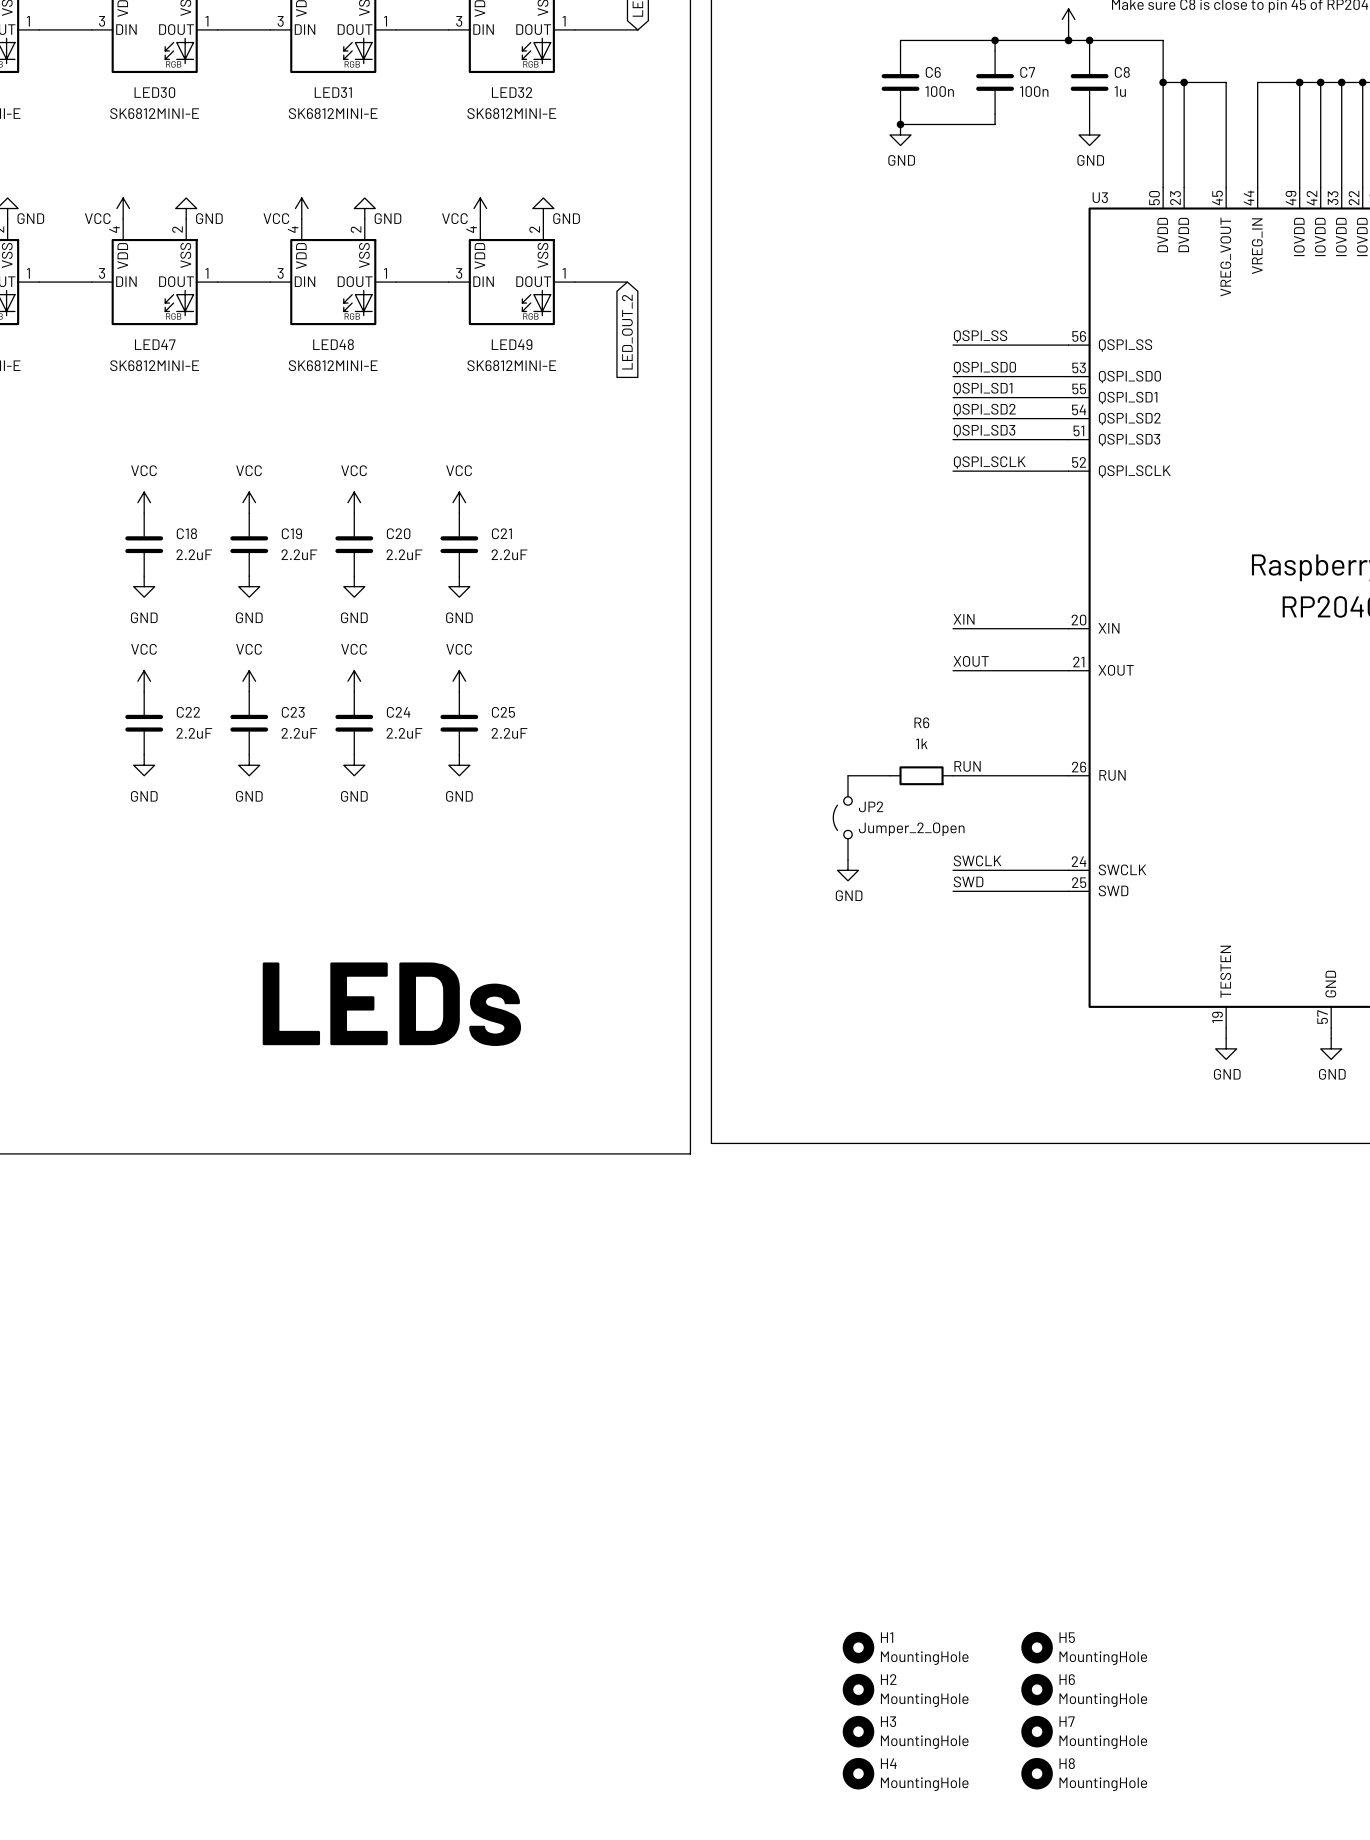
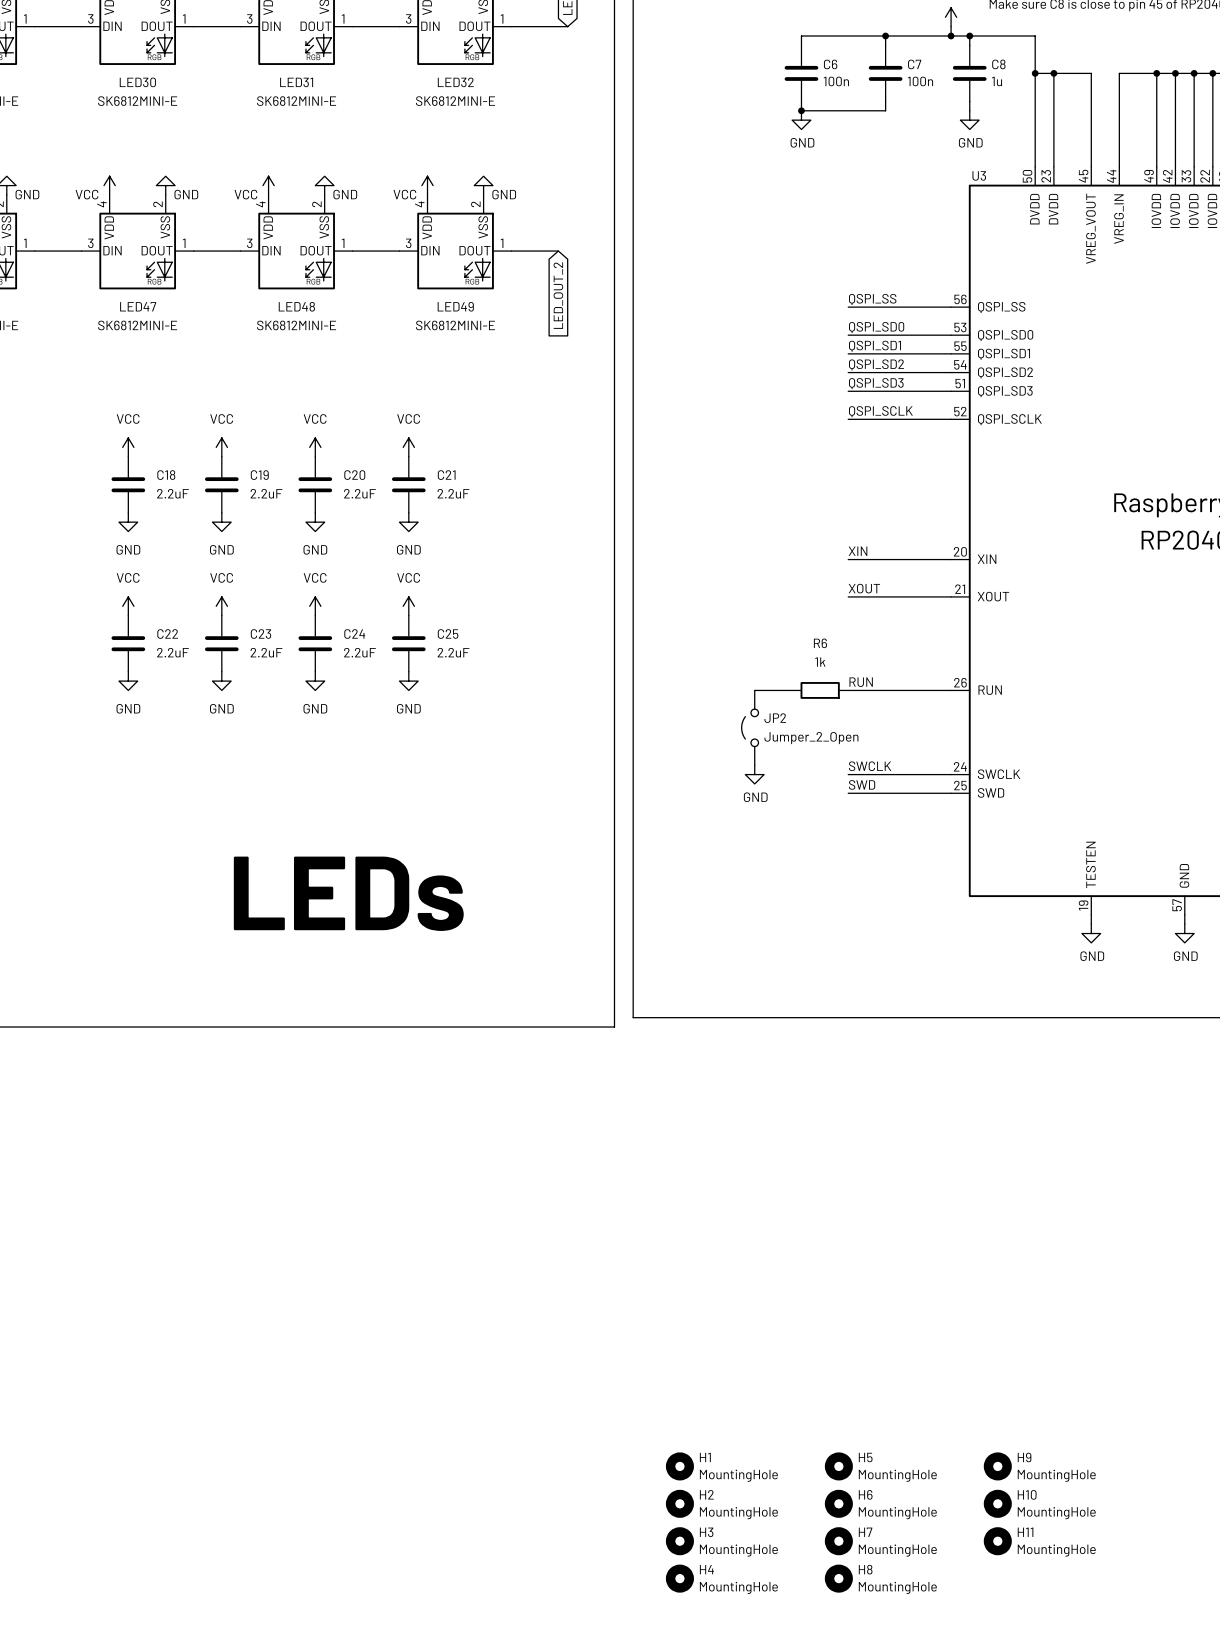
H1 position: (858, 1647) -> (679, 1466)
H5 position: (1037, 1647) -> (838, 1466)
H9: none -> MountingHole (997, 1466)
H2 position: (858, 1689) -> (679, 1503)
H6 position: (1037, 1689) -> (838, 1503)
H10: none -> MountingHole (997, 1503)
H3 position: (858, 1731) -> (679, 1541)
H7 position: (1037, 1731) -> (838, 1541)
H11: none -> MountingHole (997, 1541)
H4 position: (858, 1773) -> (679, 1578)
H8 position: (1037, 1773) -> (838, 1578)

